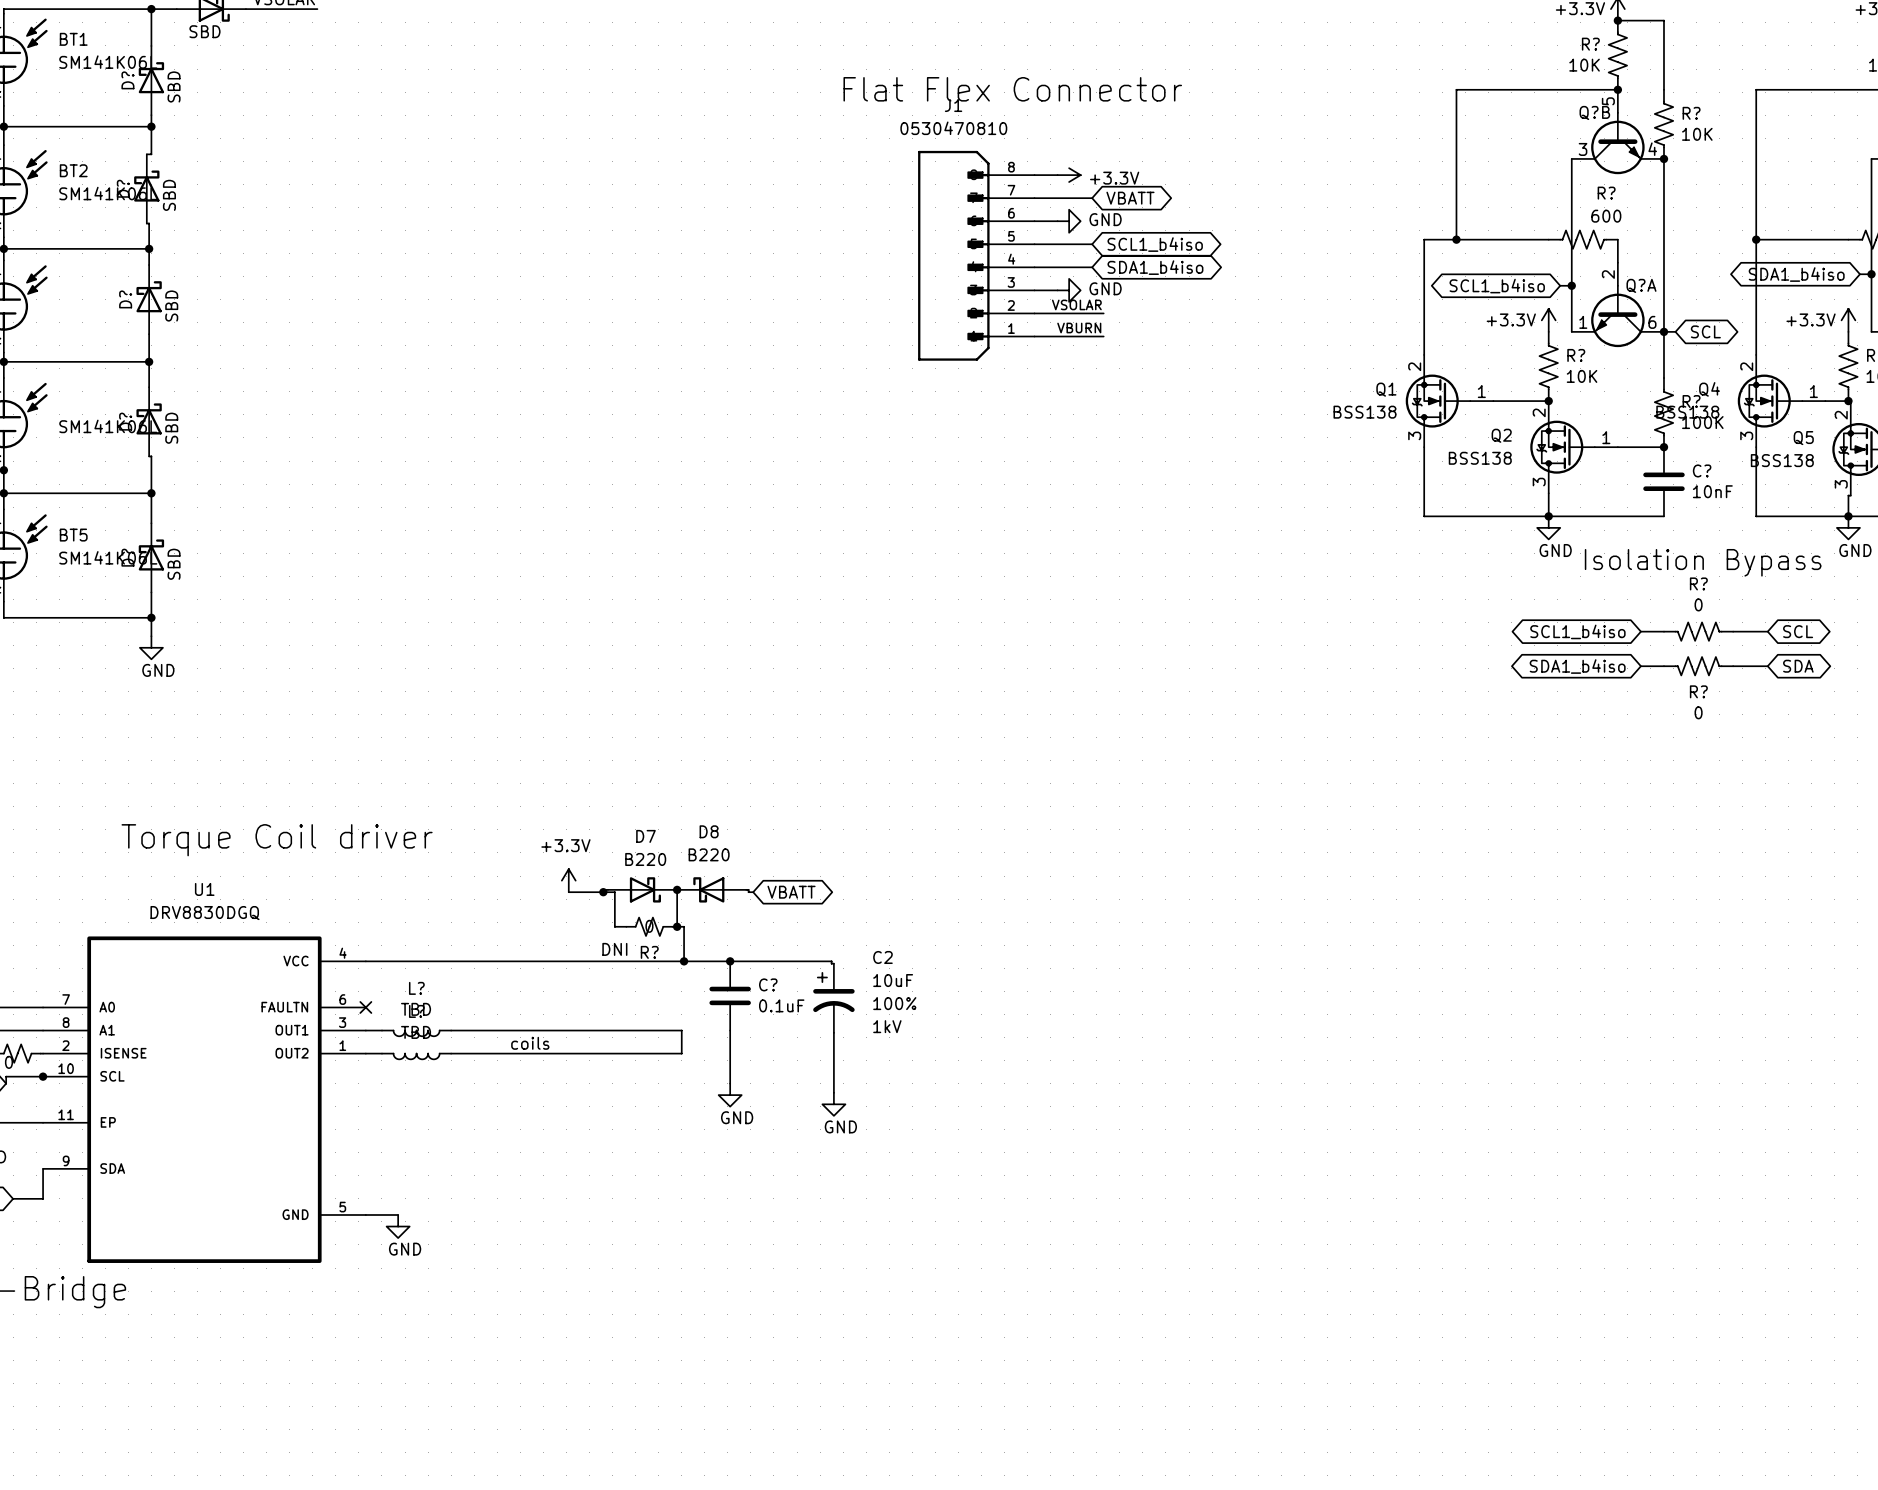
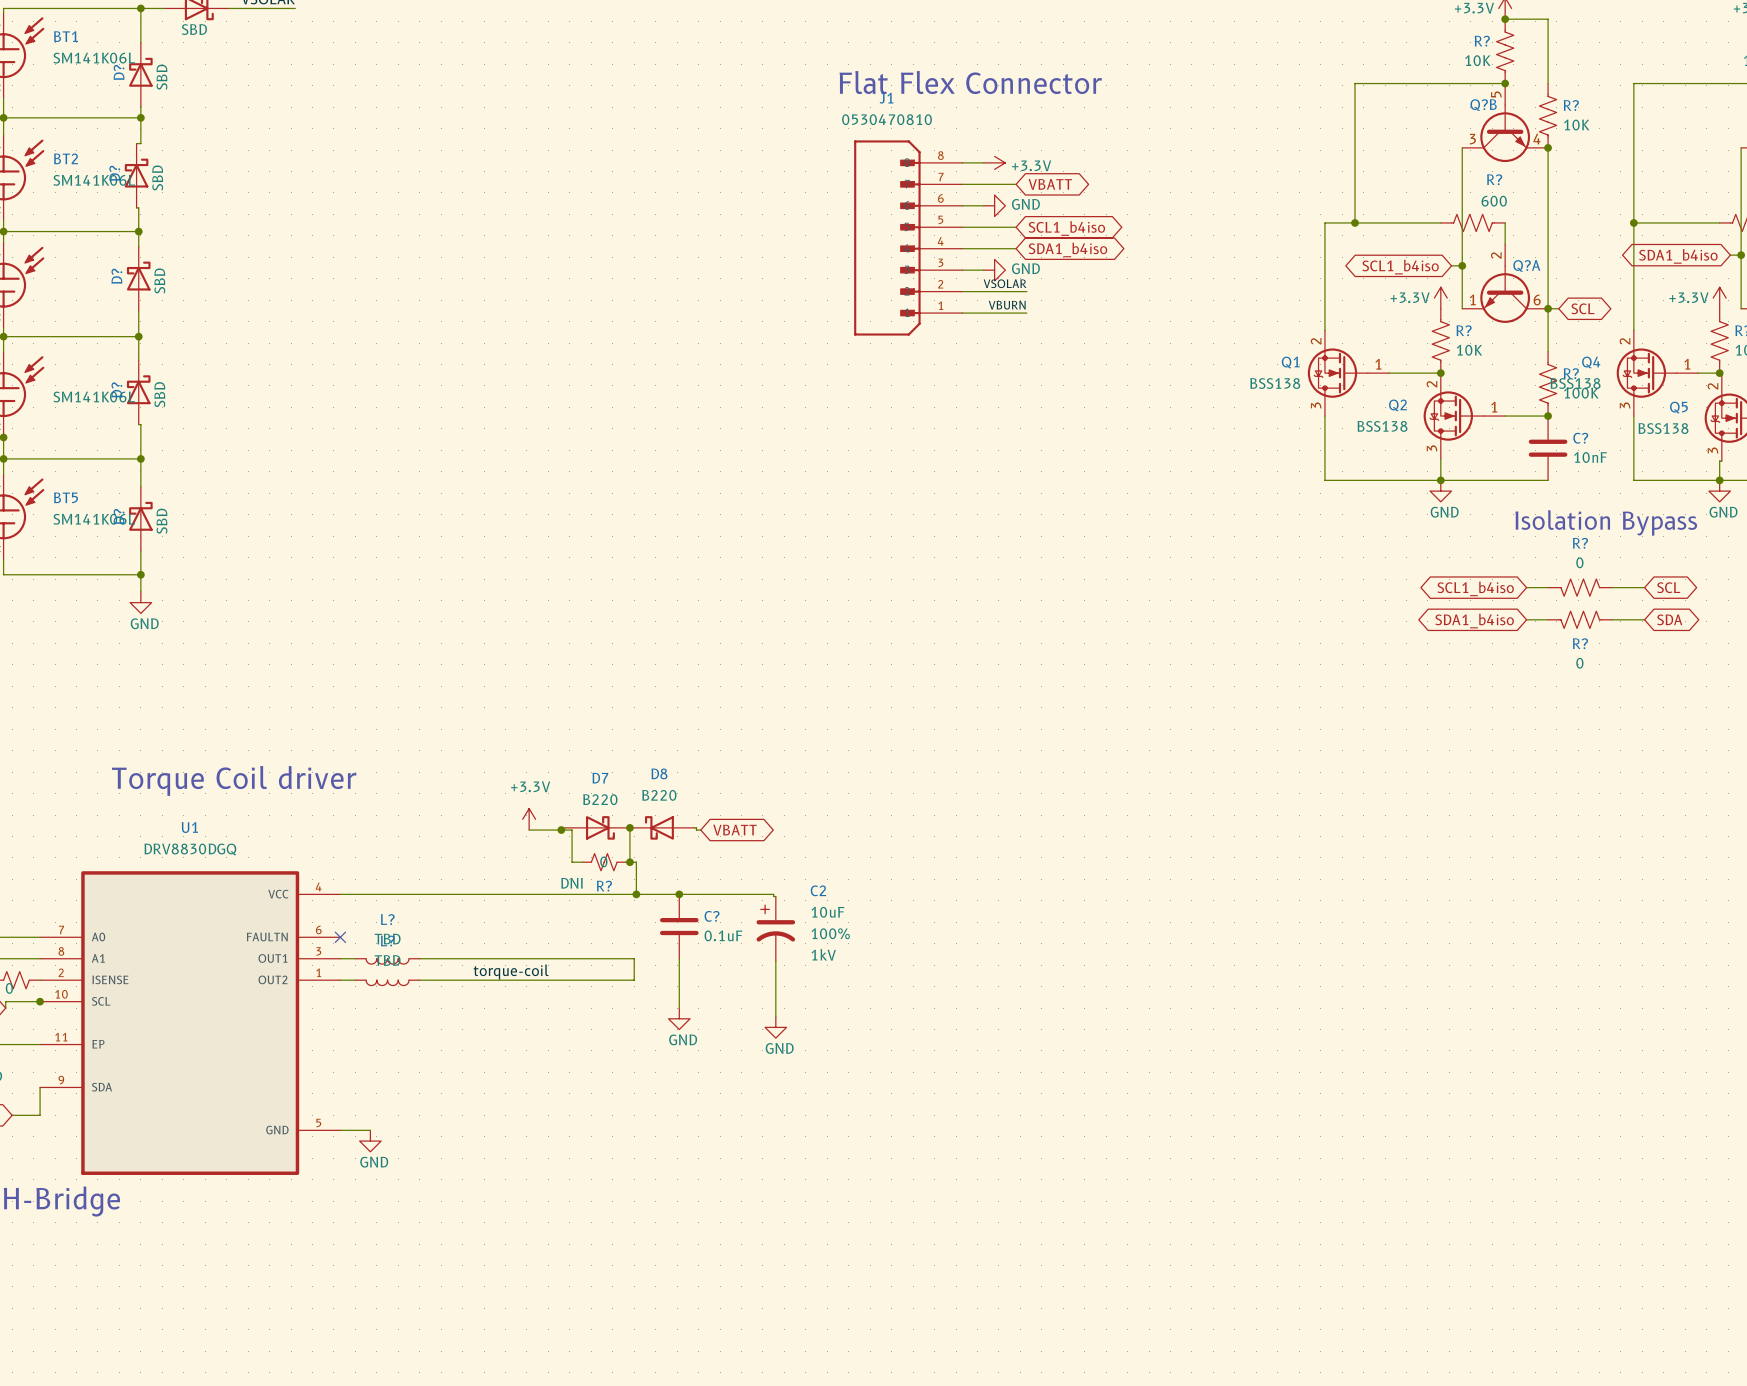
label: coils (530, 1043) -> torque-coil (511, 972)

